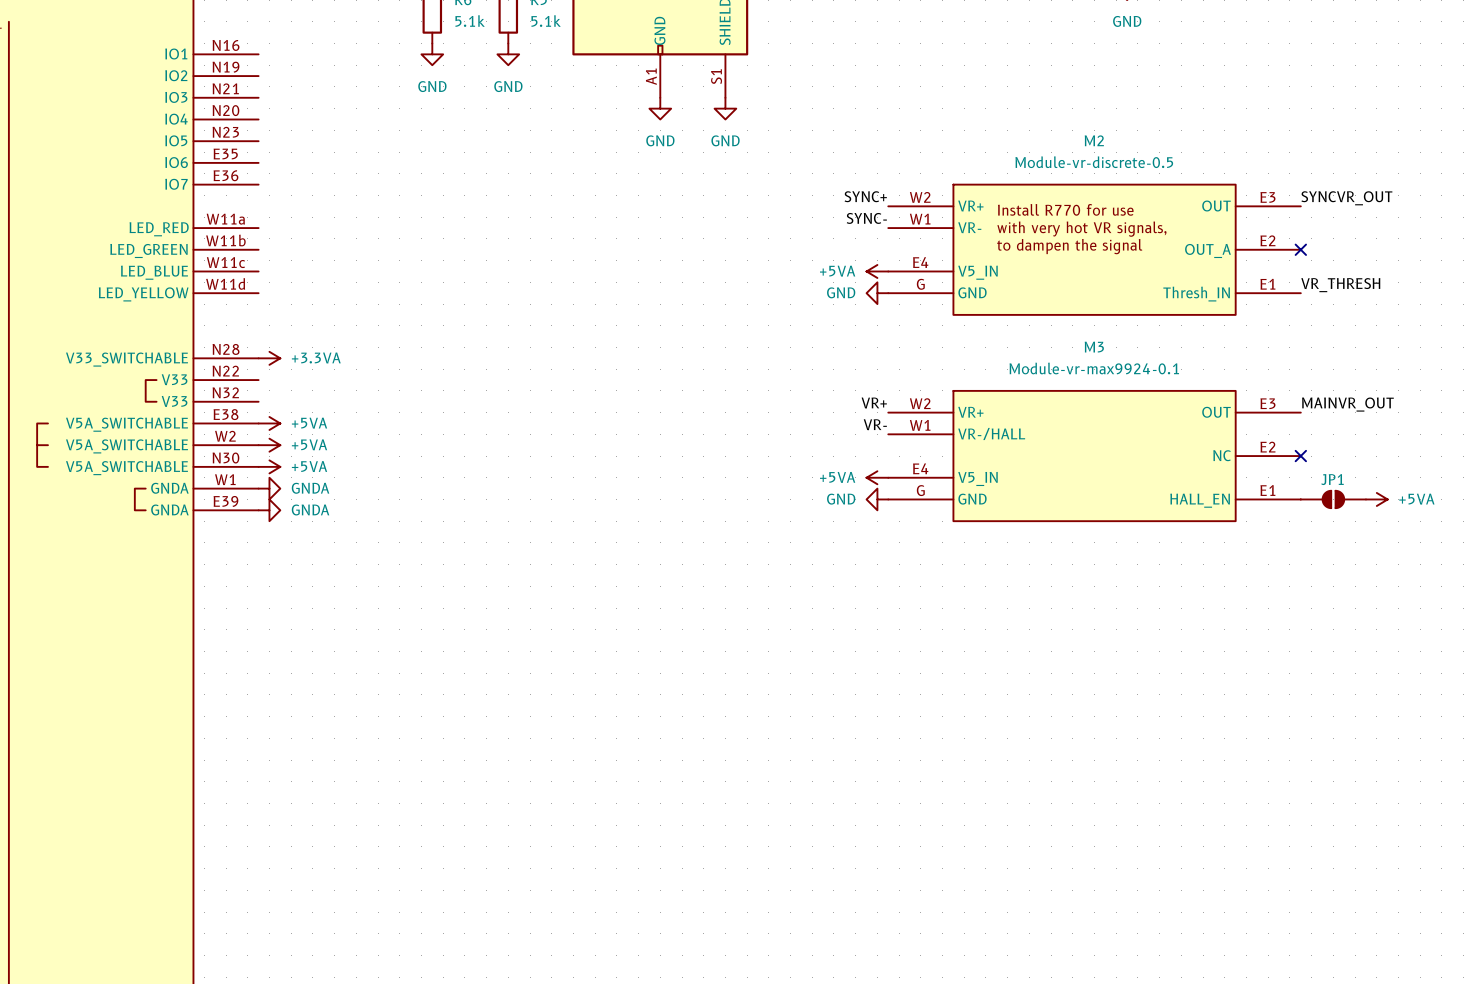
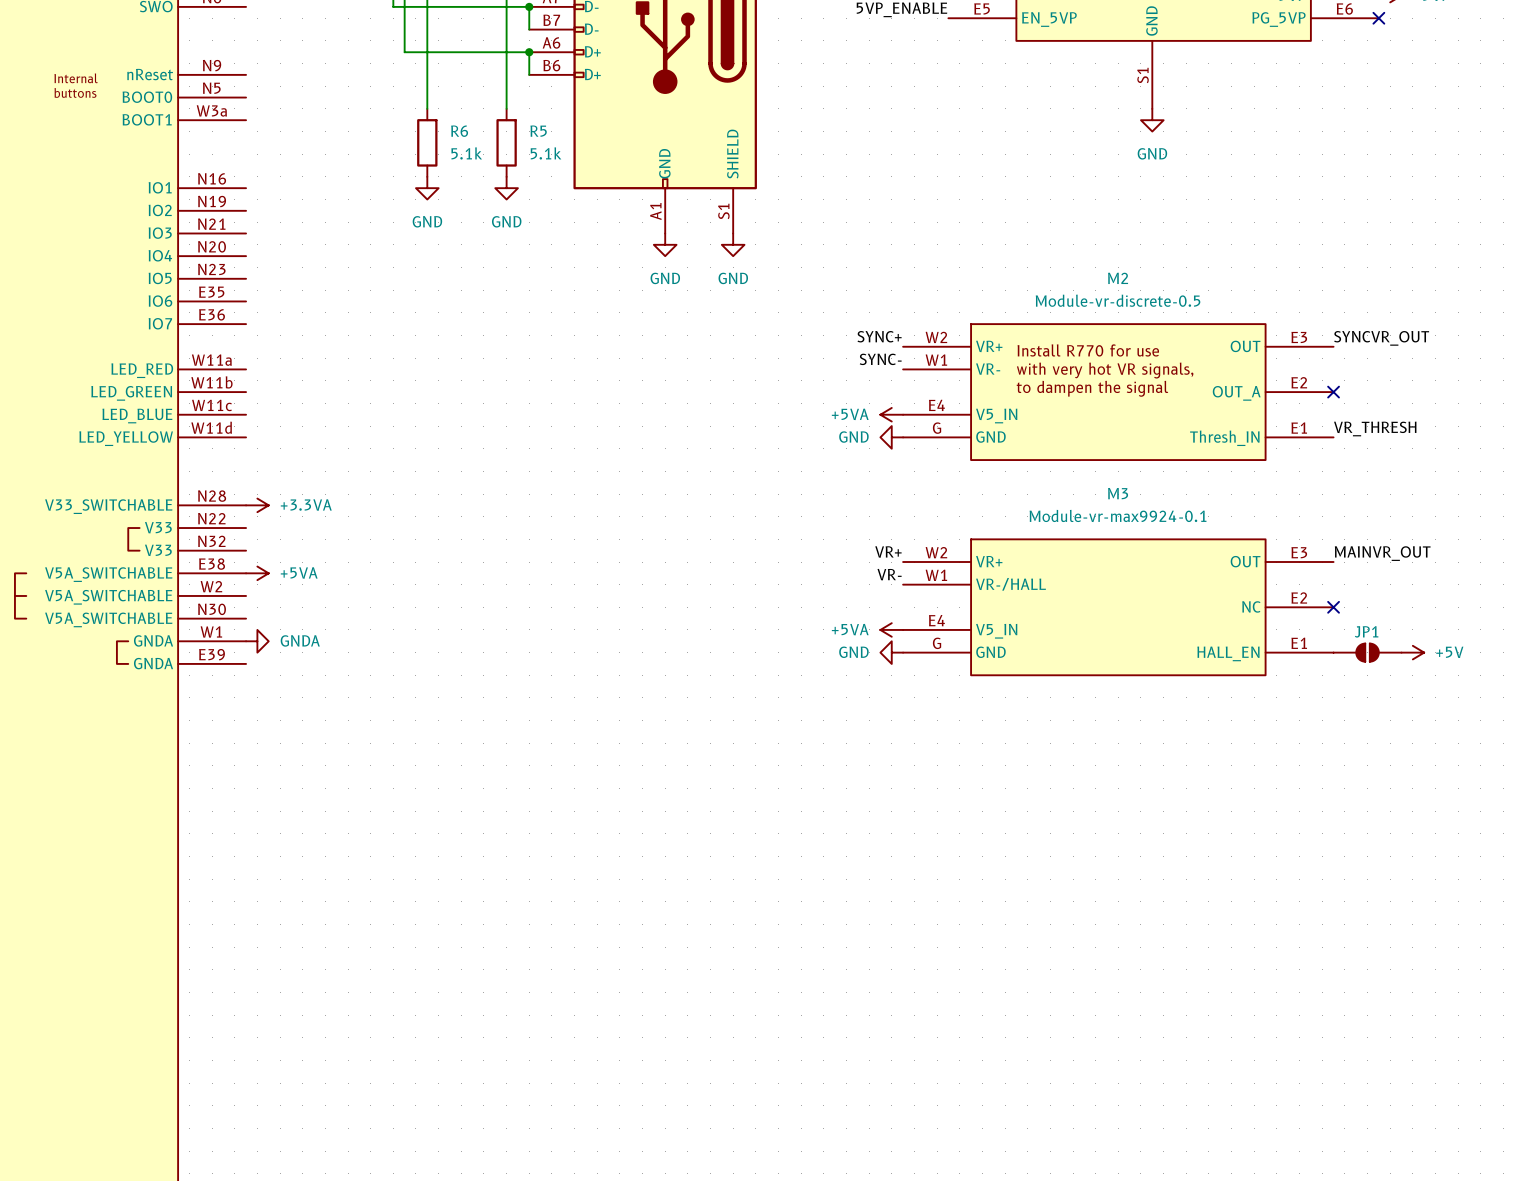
power symbol: +5VA (269, 445) -> none
power symbol: +5VA (269, 466) -> none
power symbol: +5VA (1376, 499) -> +5V (1412, 652)
power symbol: GNDA (269, 510) -> none

